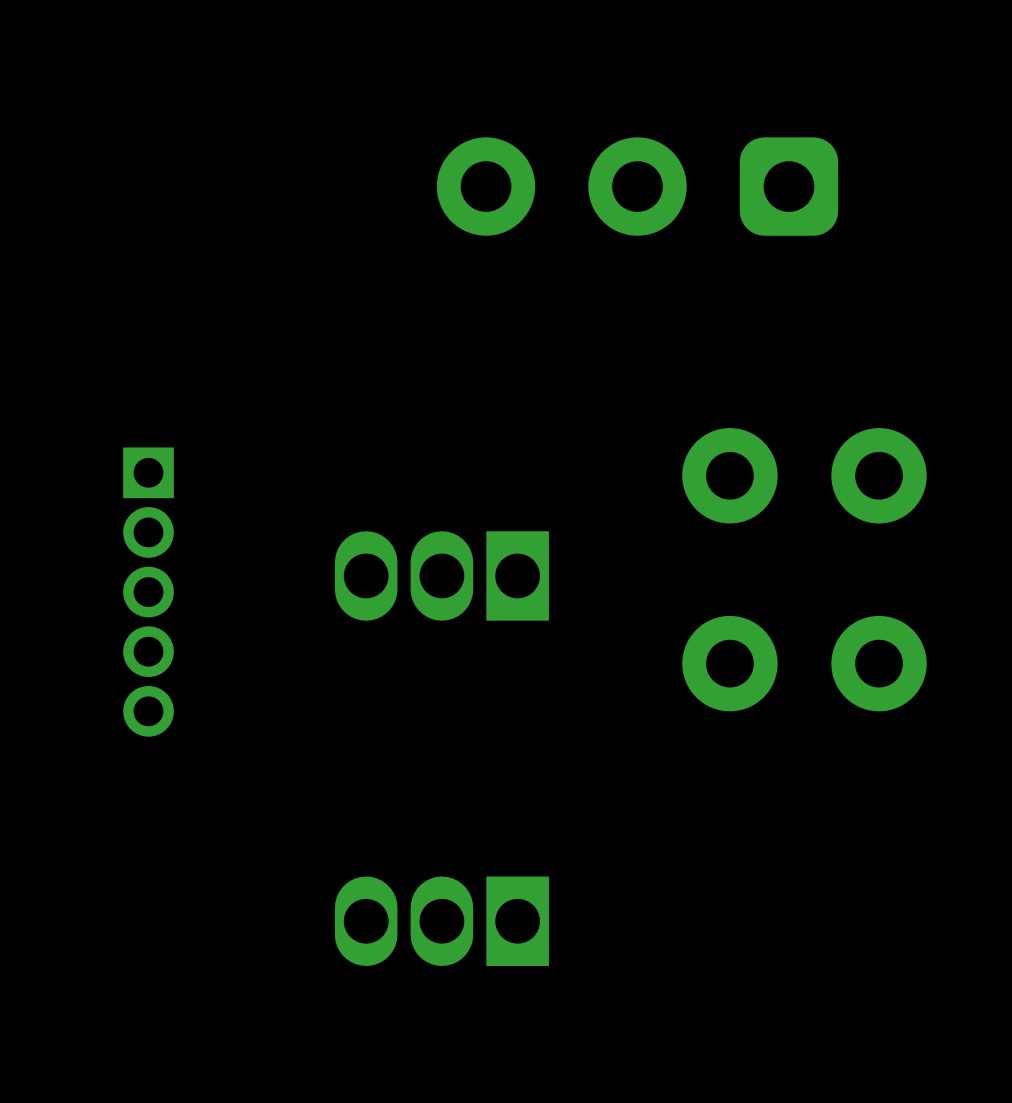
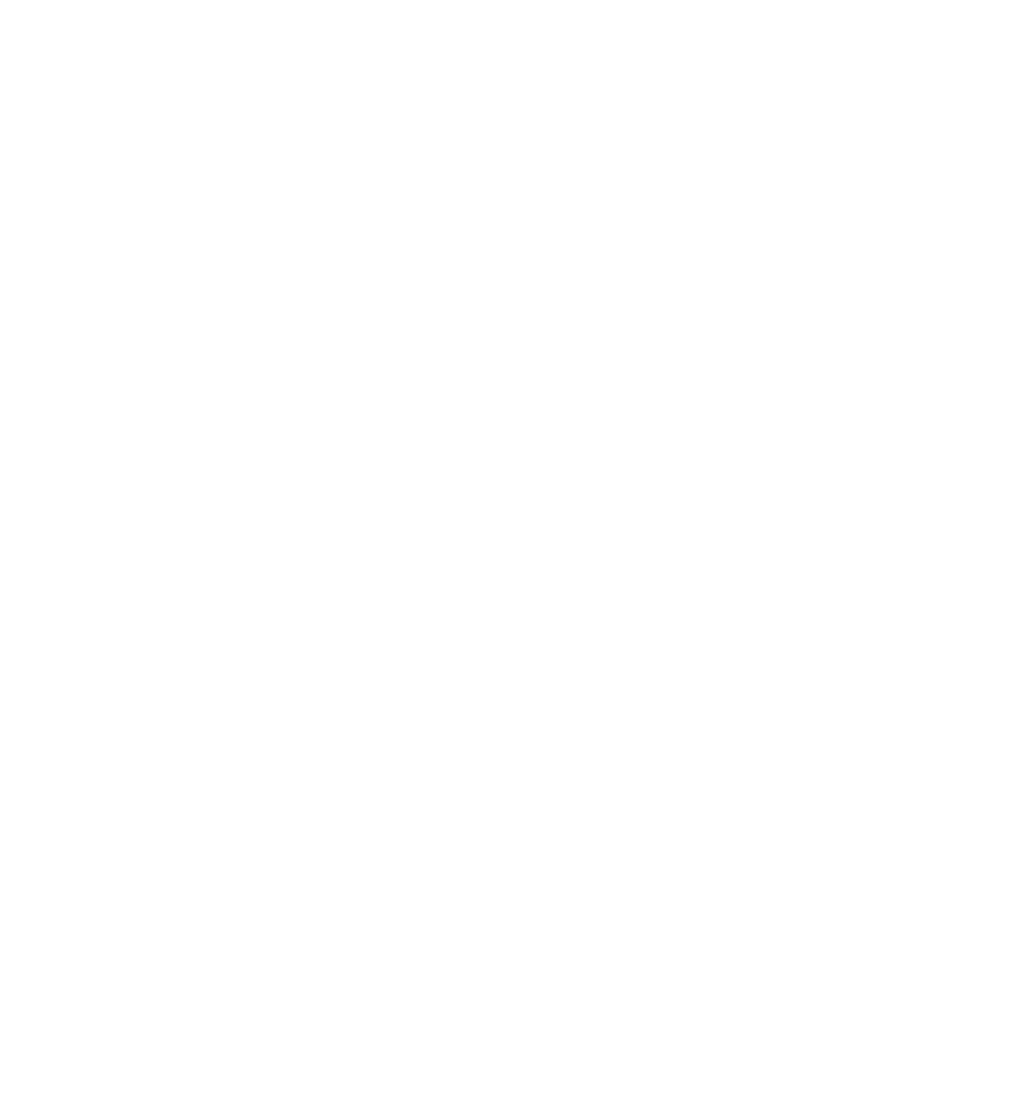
part: (637, 186) -> none
part: (804, 475) -> none
part: (441, 575) -> none
part: (148, 592) -> none
part: (804, 663) -> none
part: (441, 921) -> none

